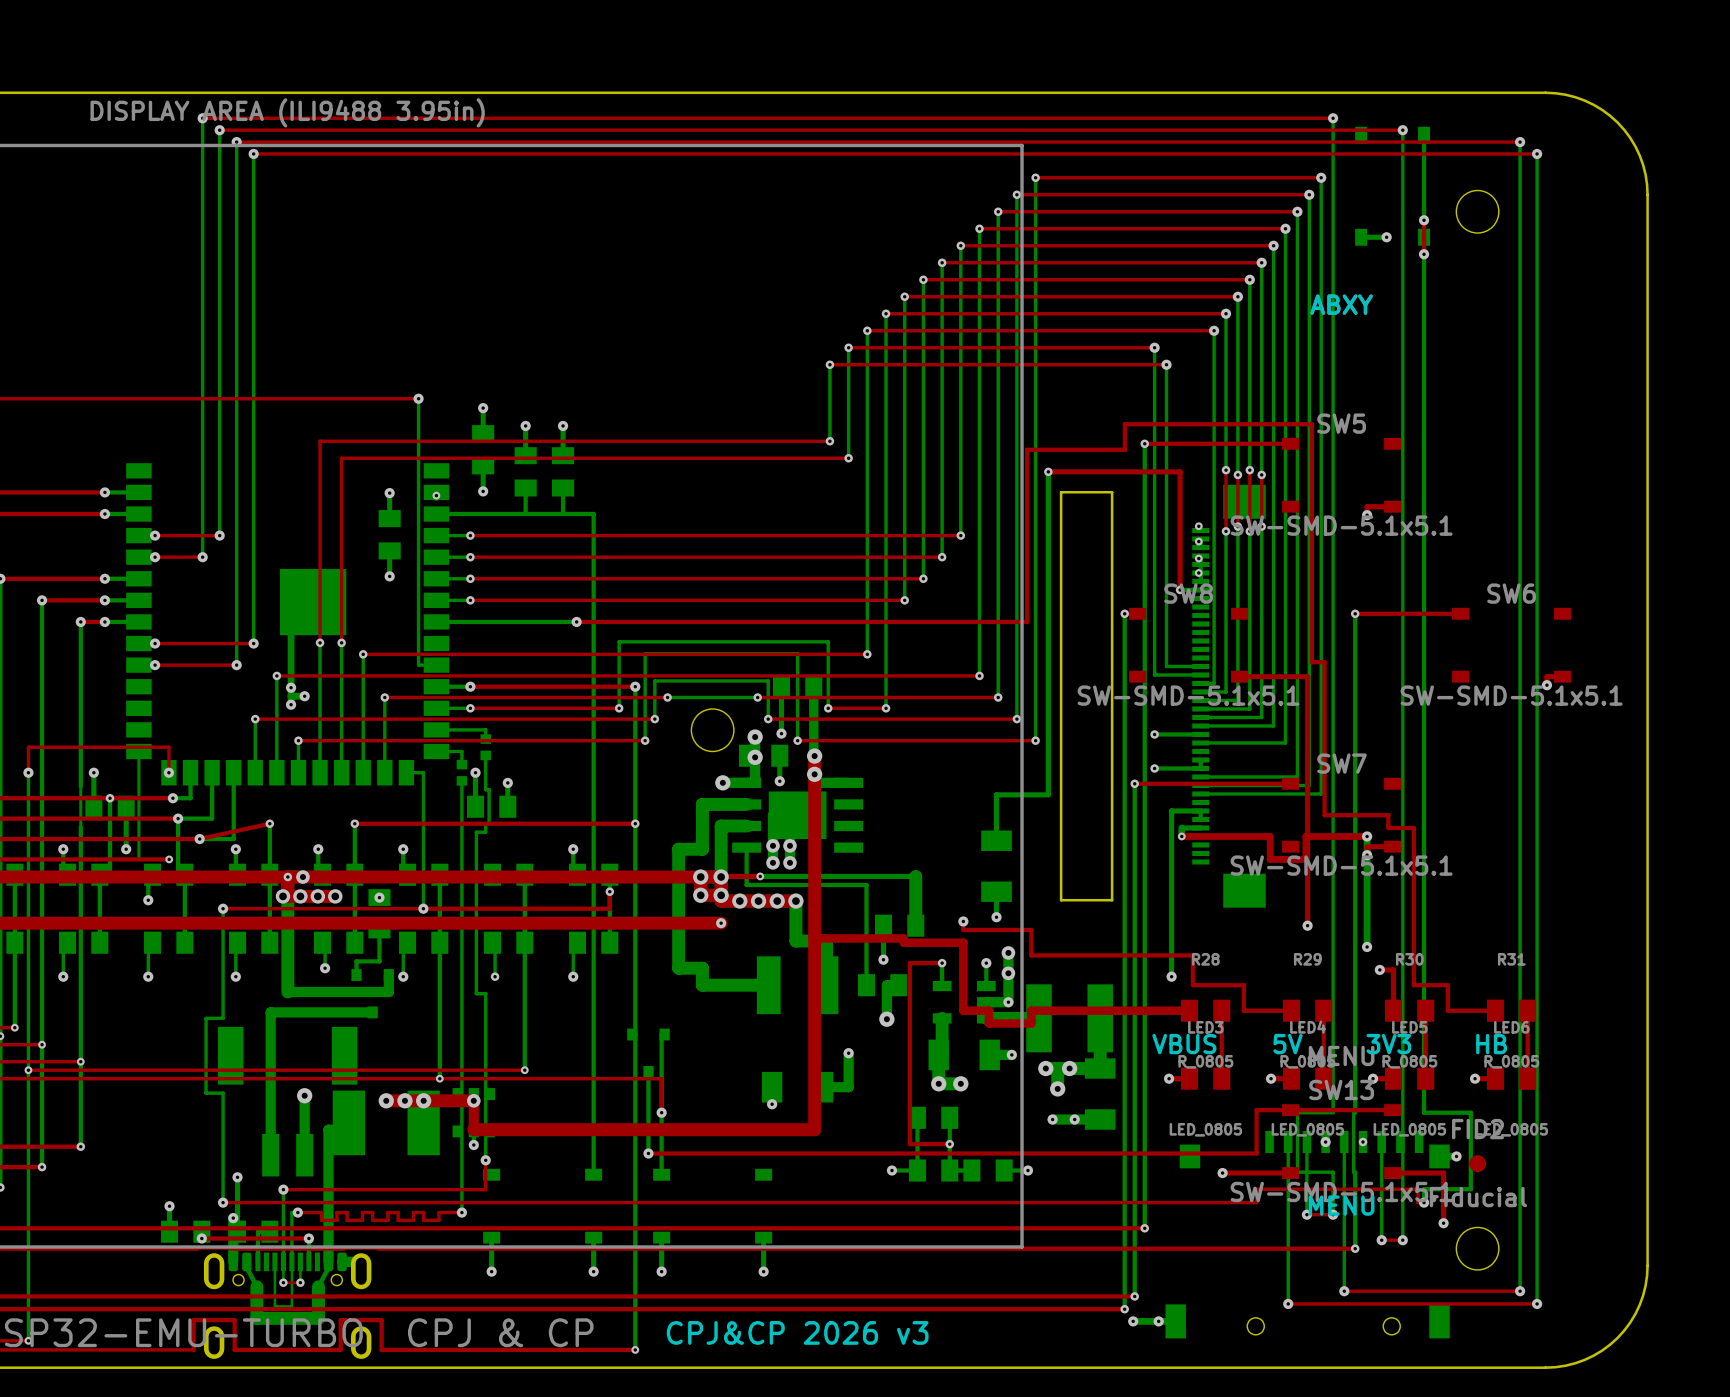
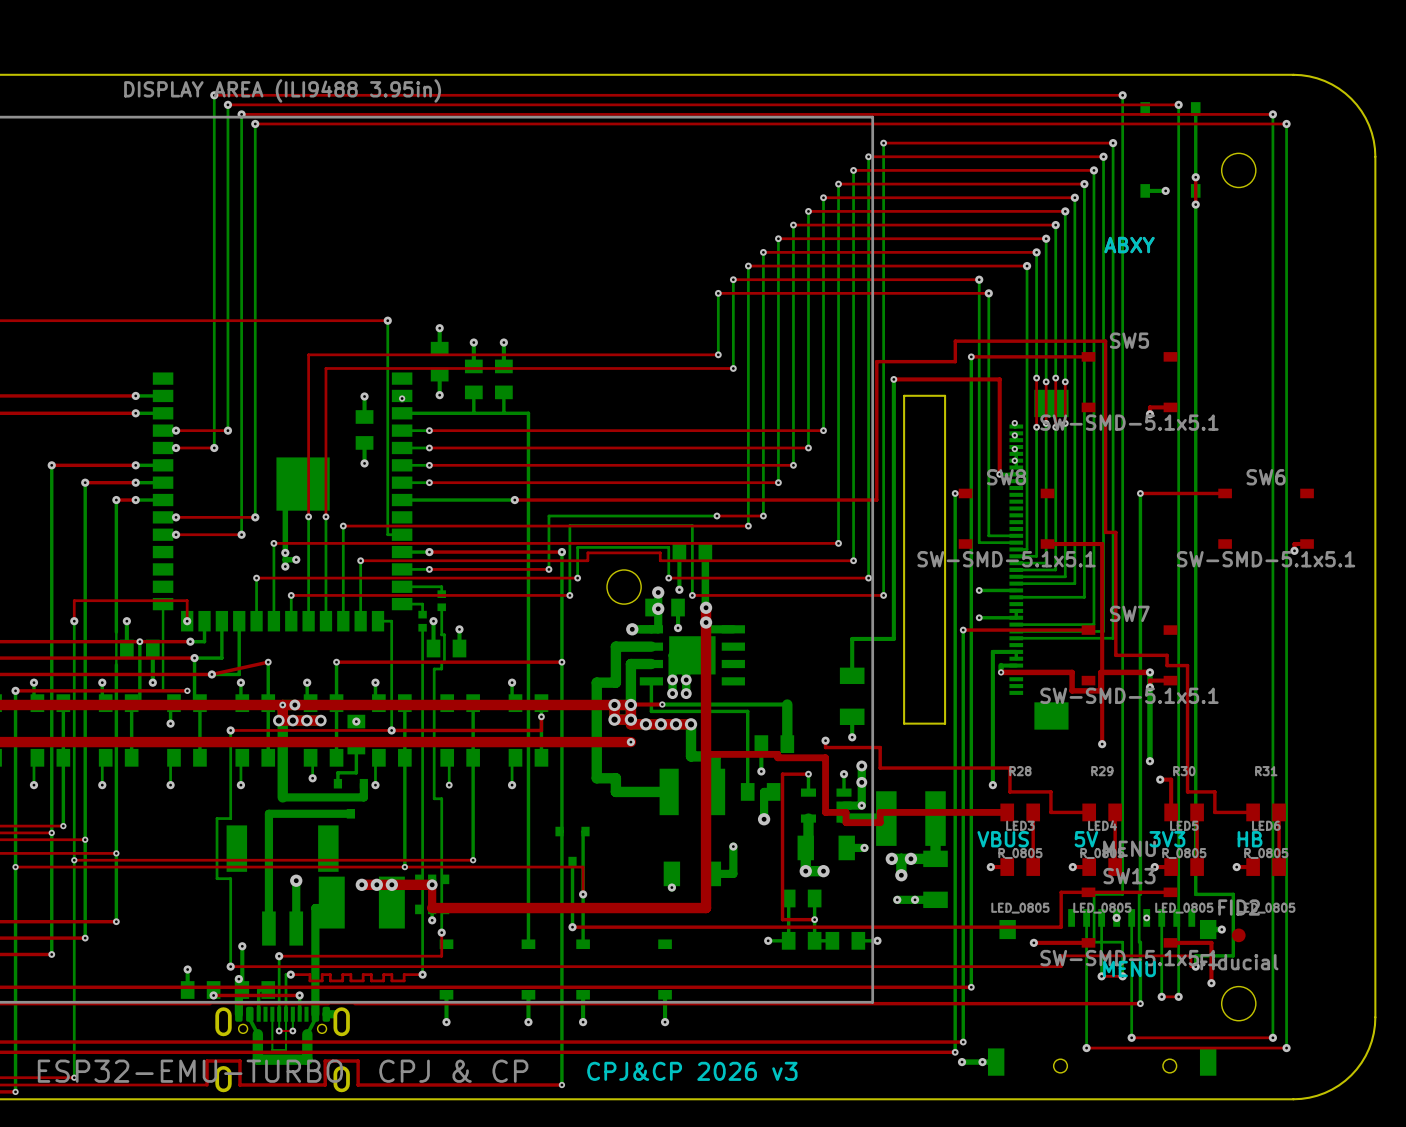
bottom track: (828, 641) (828, 708) -> none
via: none -> (716, 516)
bottom track: (886, 641) (886, 708) -> none
via: none -> (763, 516)
bottom track: (667, 697) (757, 697) -> none
top track: none -> (587, 560) (587, 552) (660, 552) (660, 560)
via: (667, 697) -> none
via: (757, 697) -> none
top track: (828, 708) (886, 708) -> (716, 516) (763, 516)
via: (828, 708) -> none
via: (886, 708) -> none

